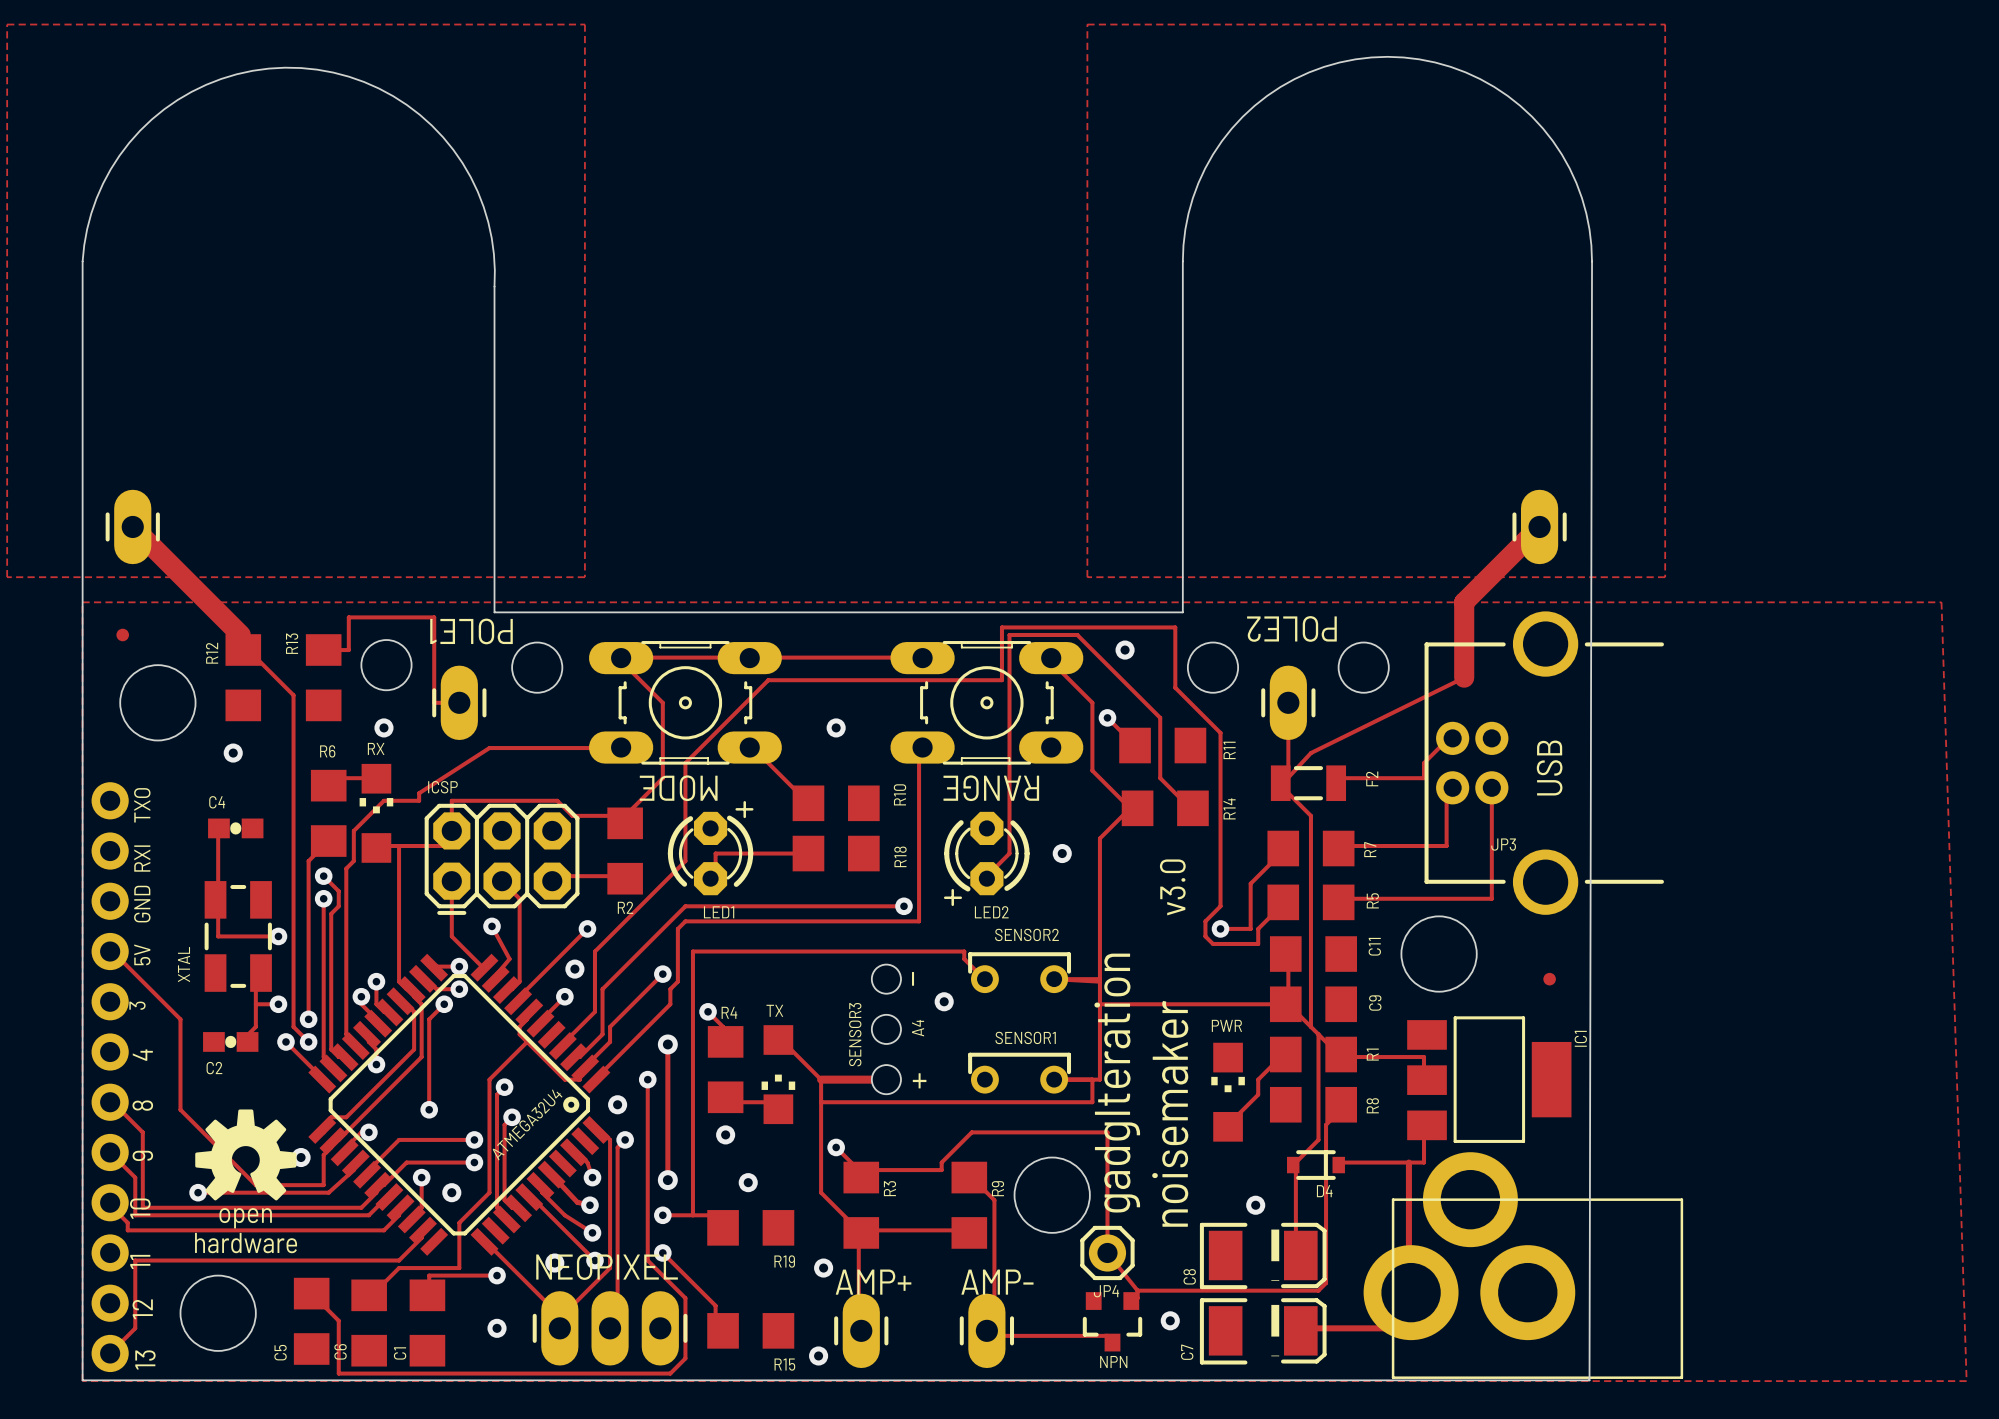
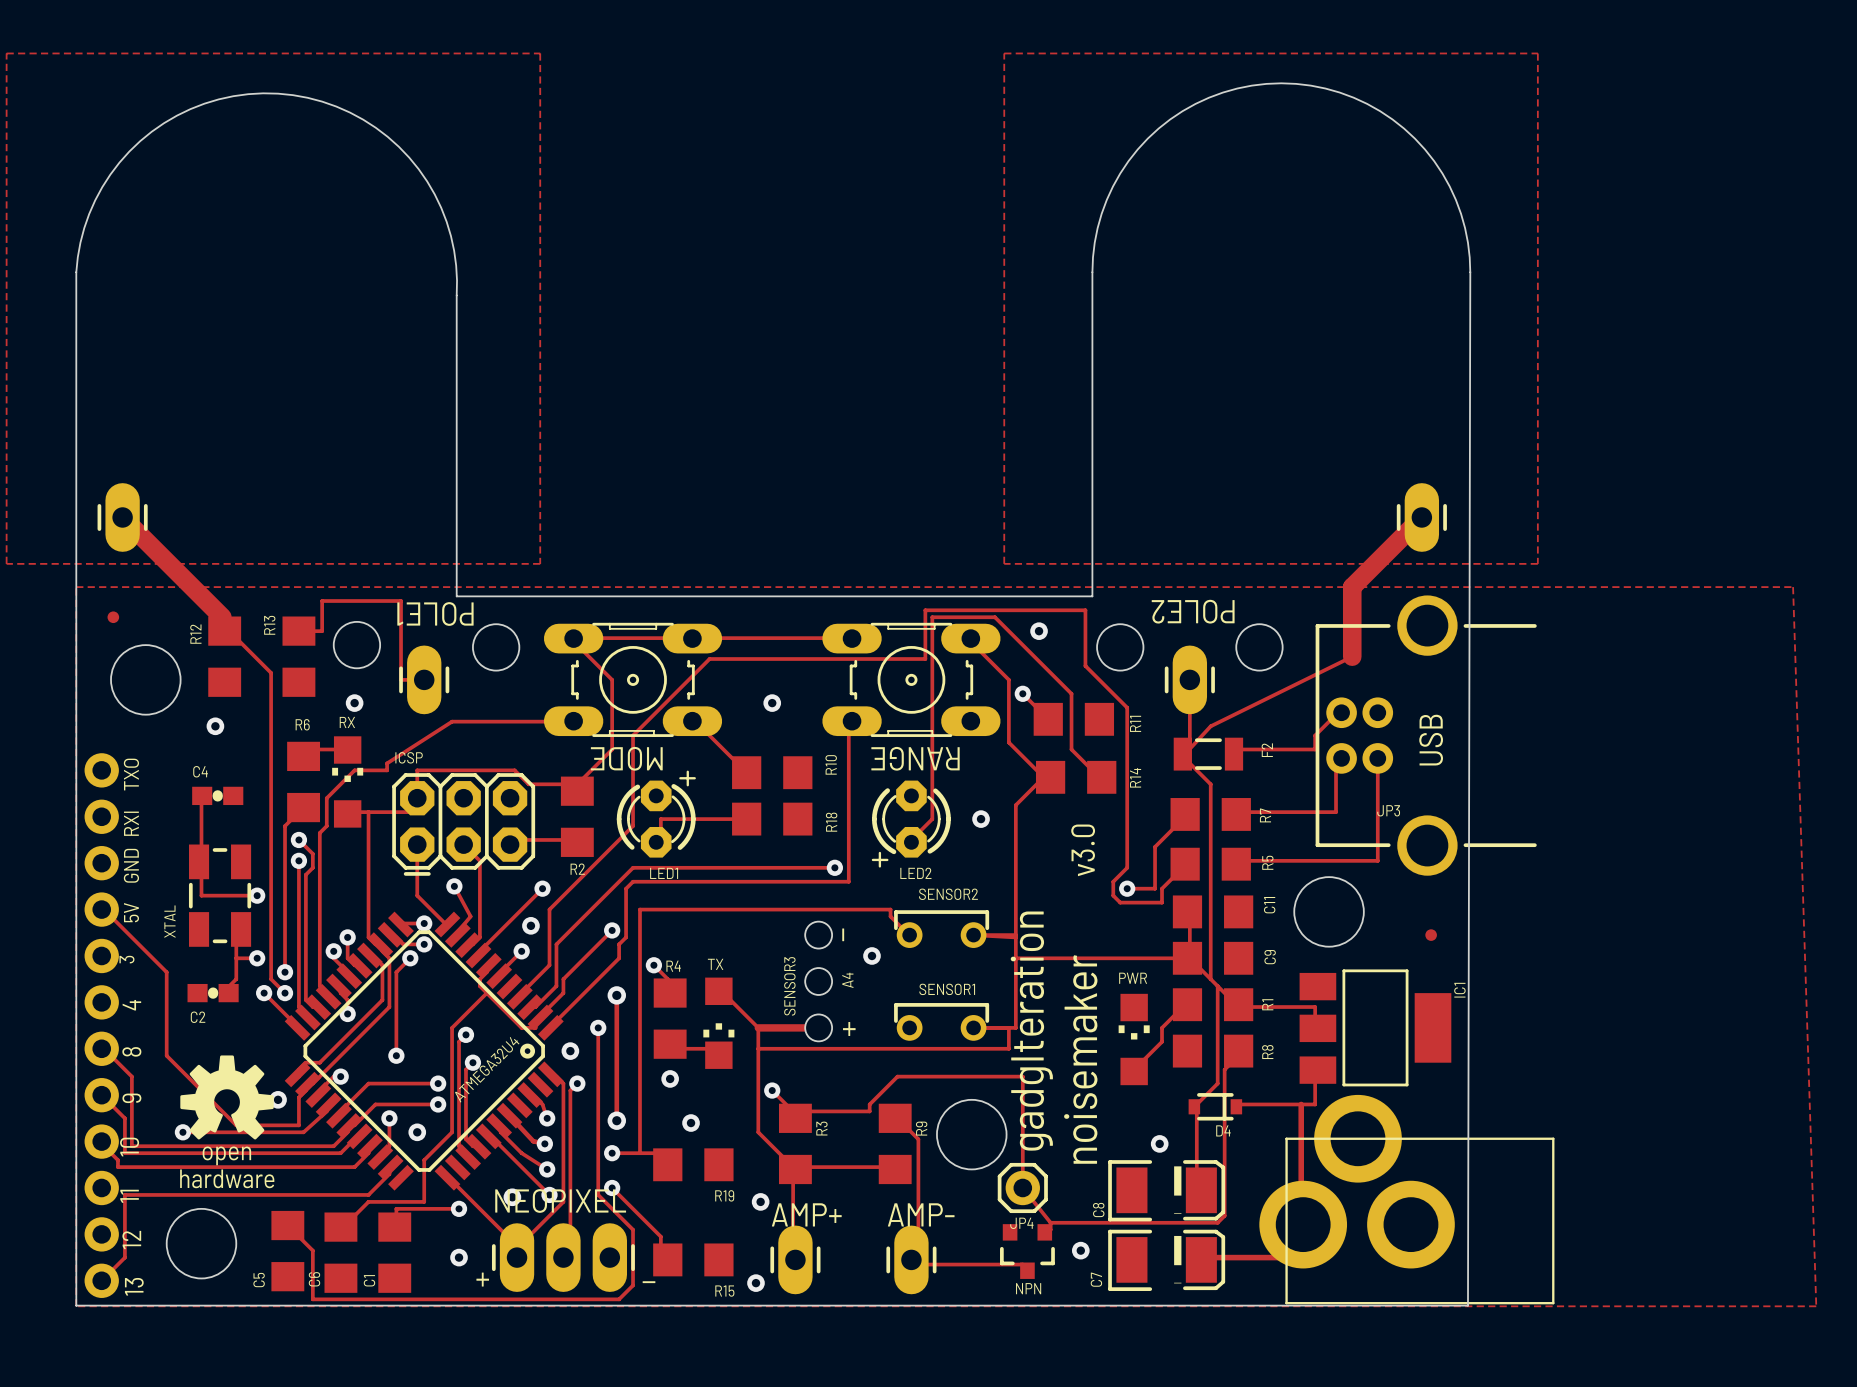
text: none -> + (482, 1279)
text: none -> _ (649, 1282)

